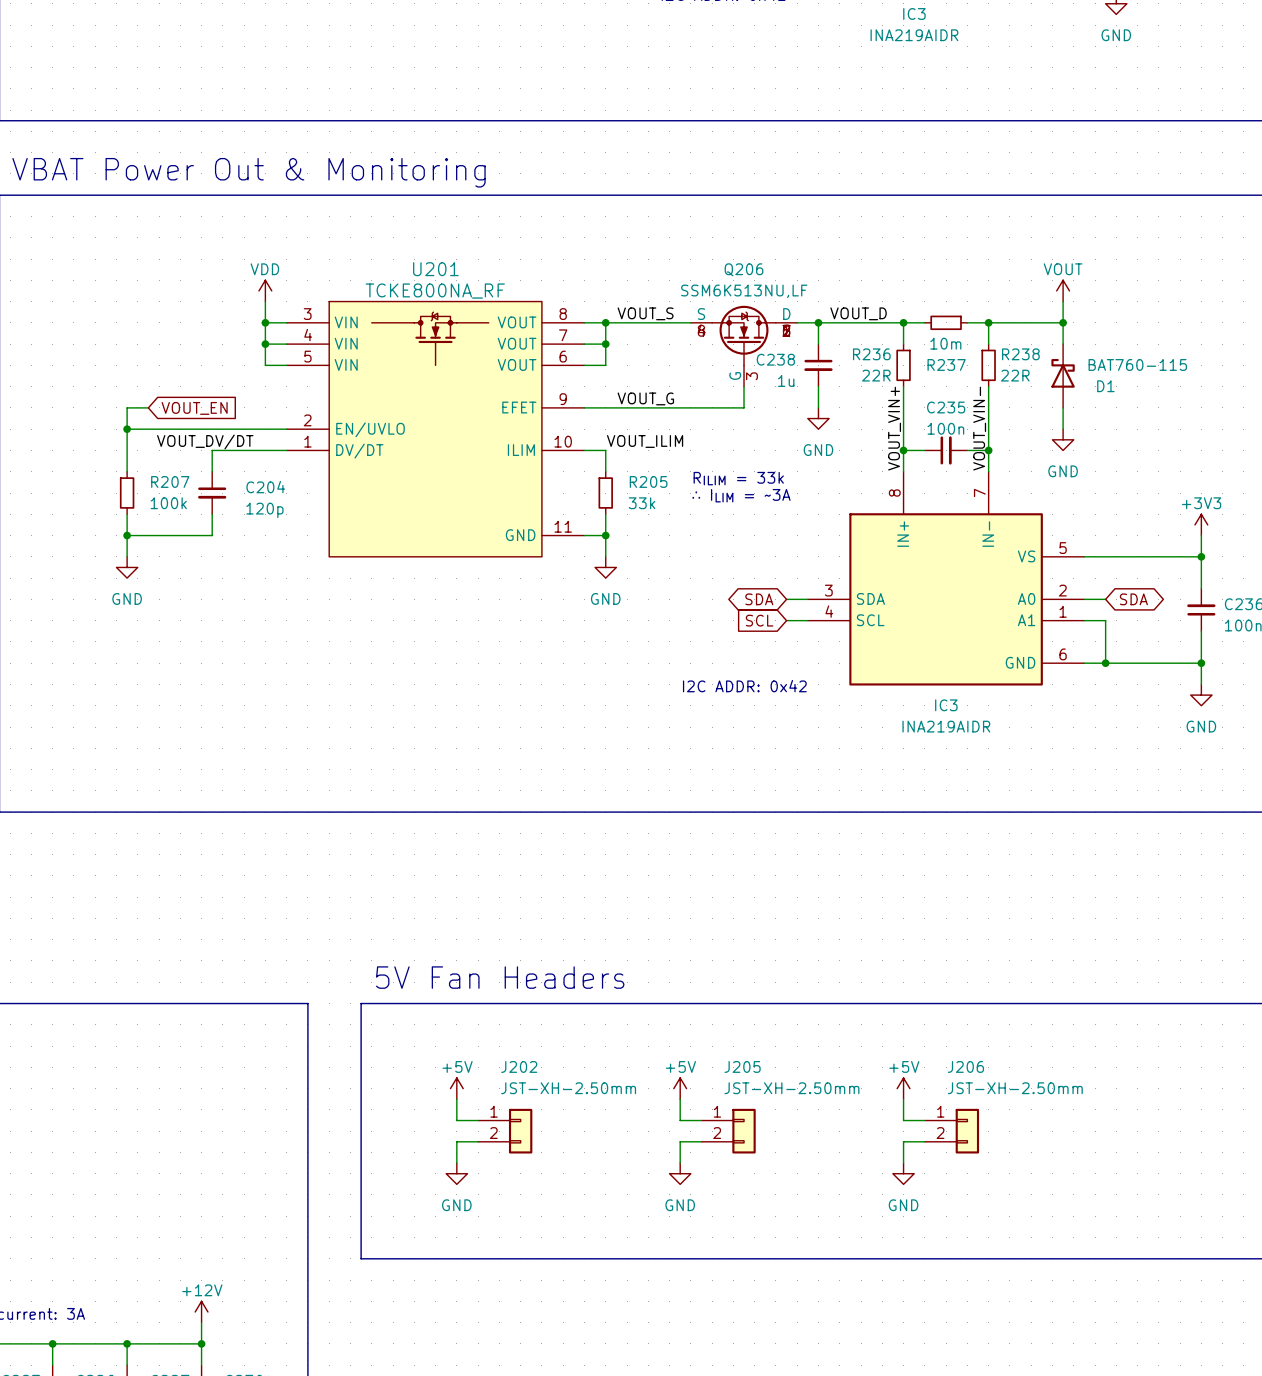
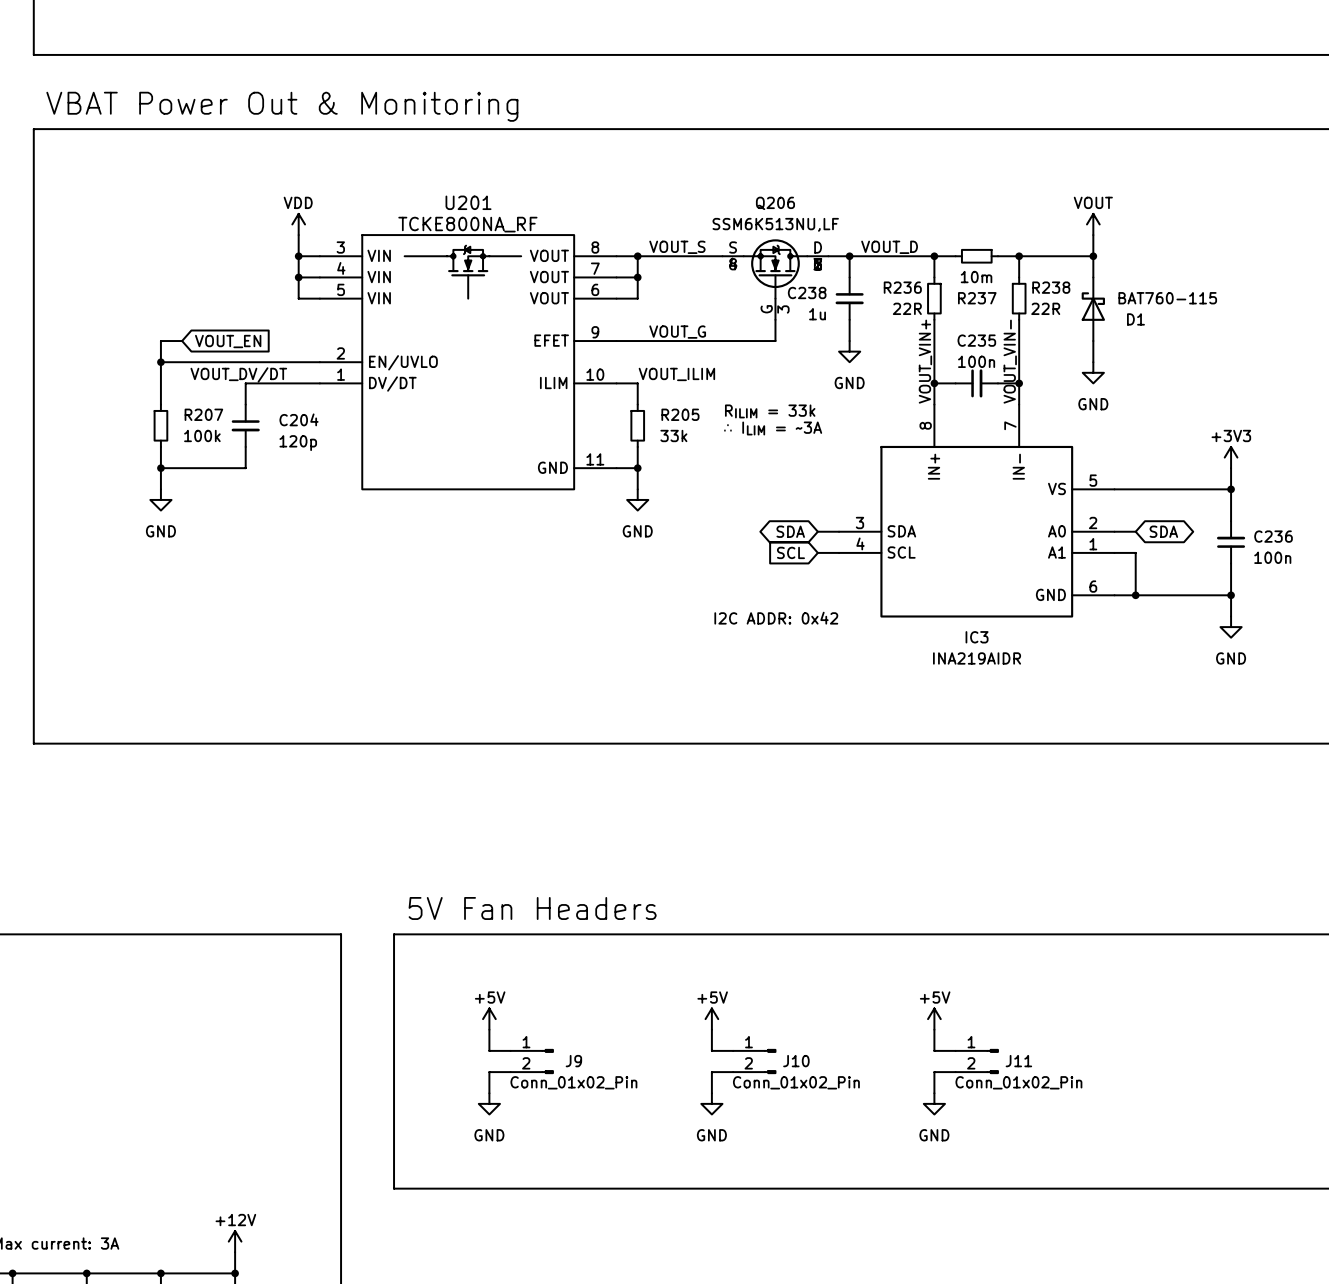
J9: none -> Conn_01x02_Pin (532, 1061)
J202: JST-XH-2.50mm (505, 1131) -> none
J10: none -> Conn_01x02_Pin (754, 1061)
J205: JST-XH-2.50mm (728, 1131) -> none
J11: none -> Conn_01x02_Pin (977, 1061)
J206: JST-XH-2.50mm (951, 1131) -> none

